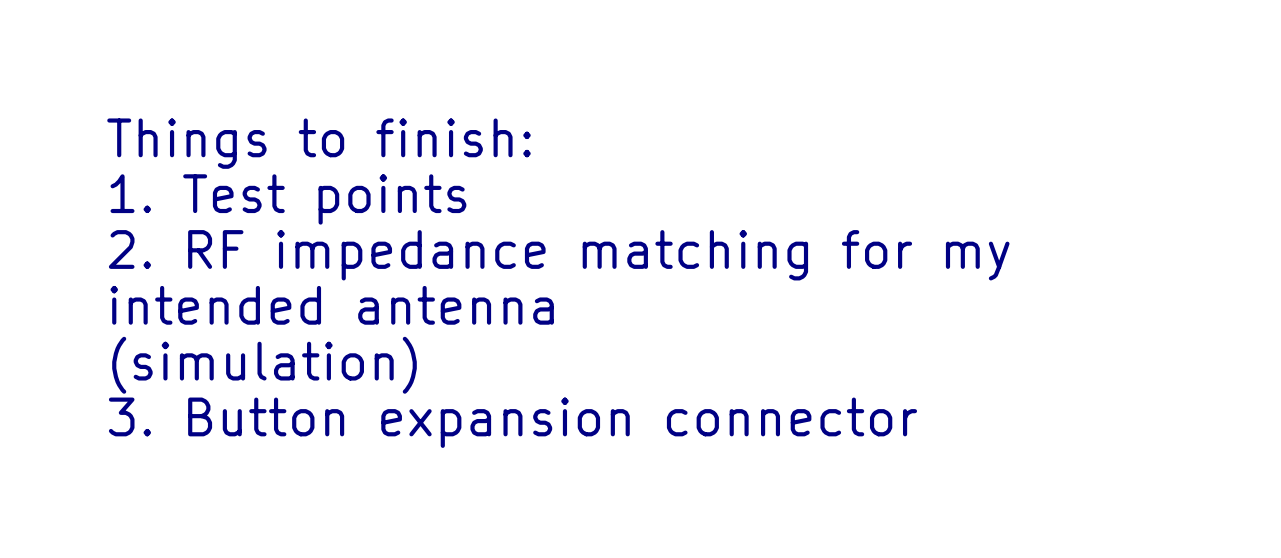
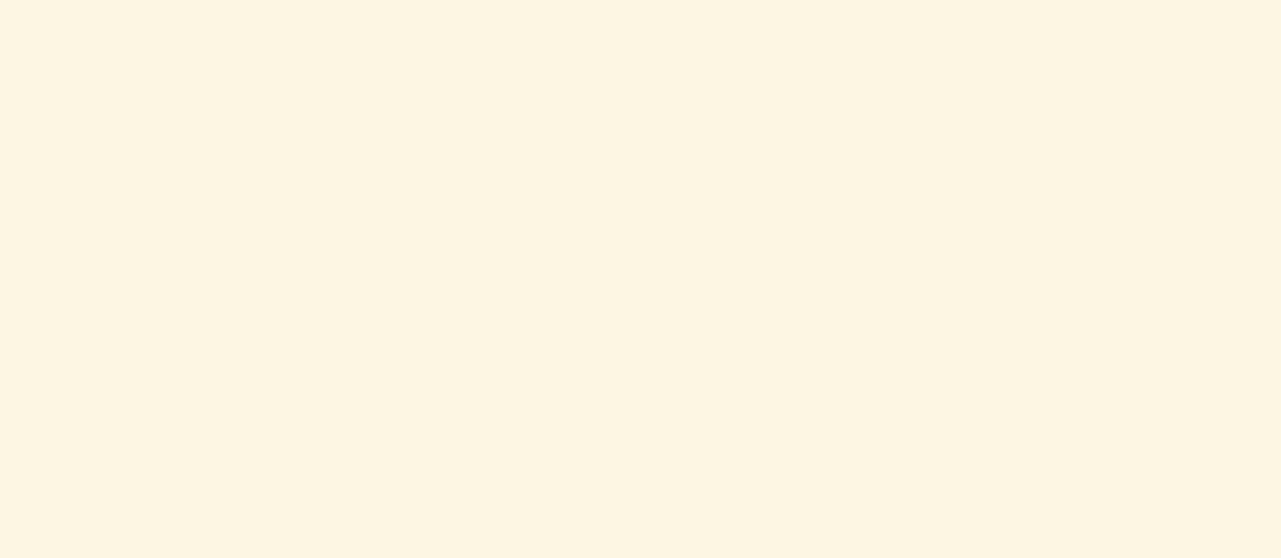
text: Things to finish: (318, 143) -> none
text: 1. Test points (288, 199) -> none
text: 2. RF impedance matching for my (559, 255) -> none
text: intended antenna (332, 305) -> none
text: (simulation) (264, 365) -> none
text: 3. Button expansion connector (512, 422) -> none

